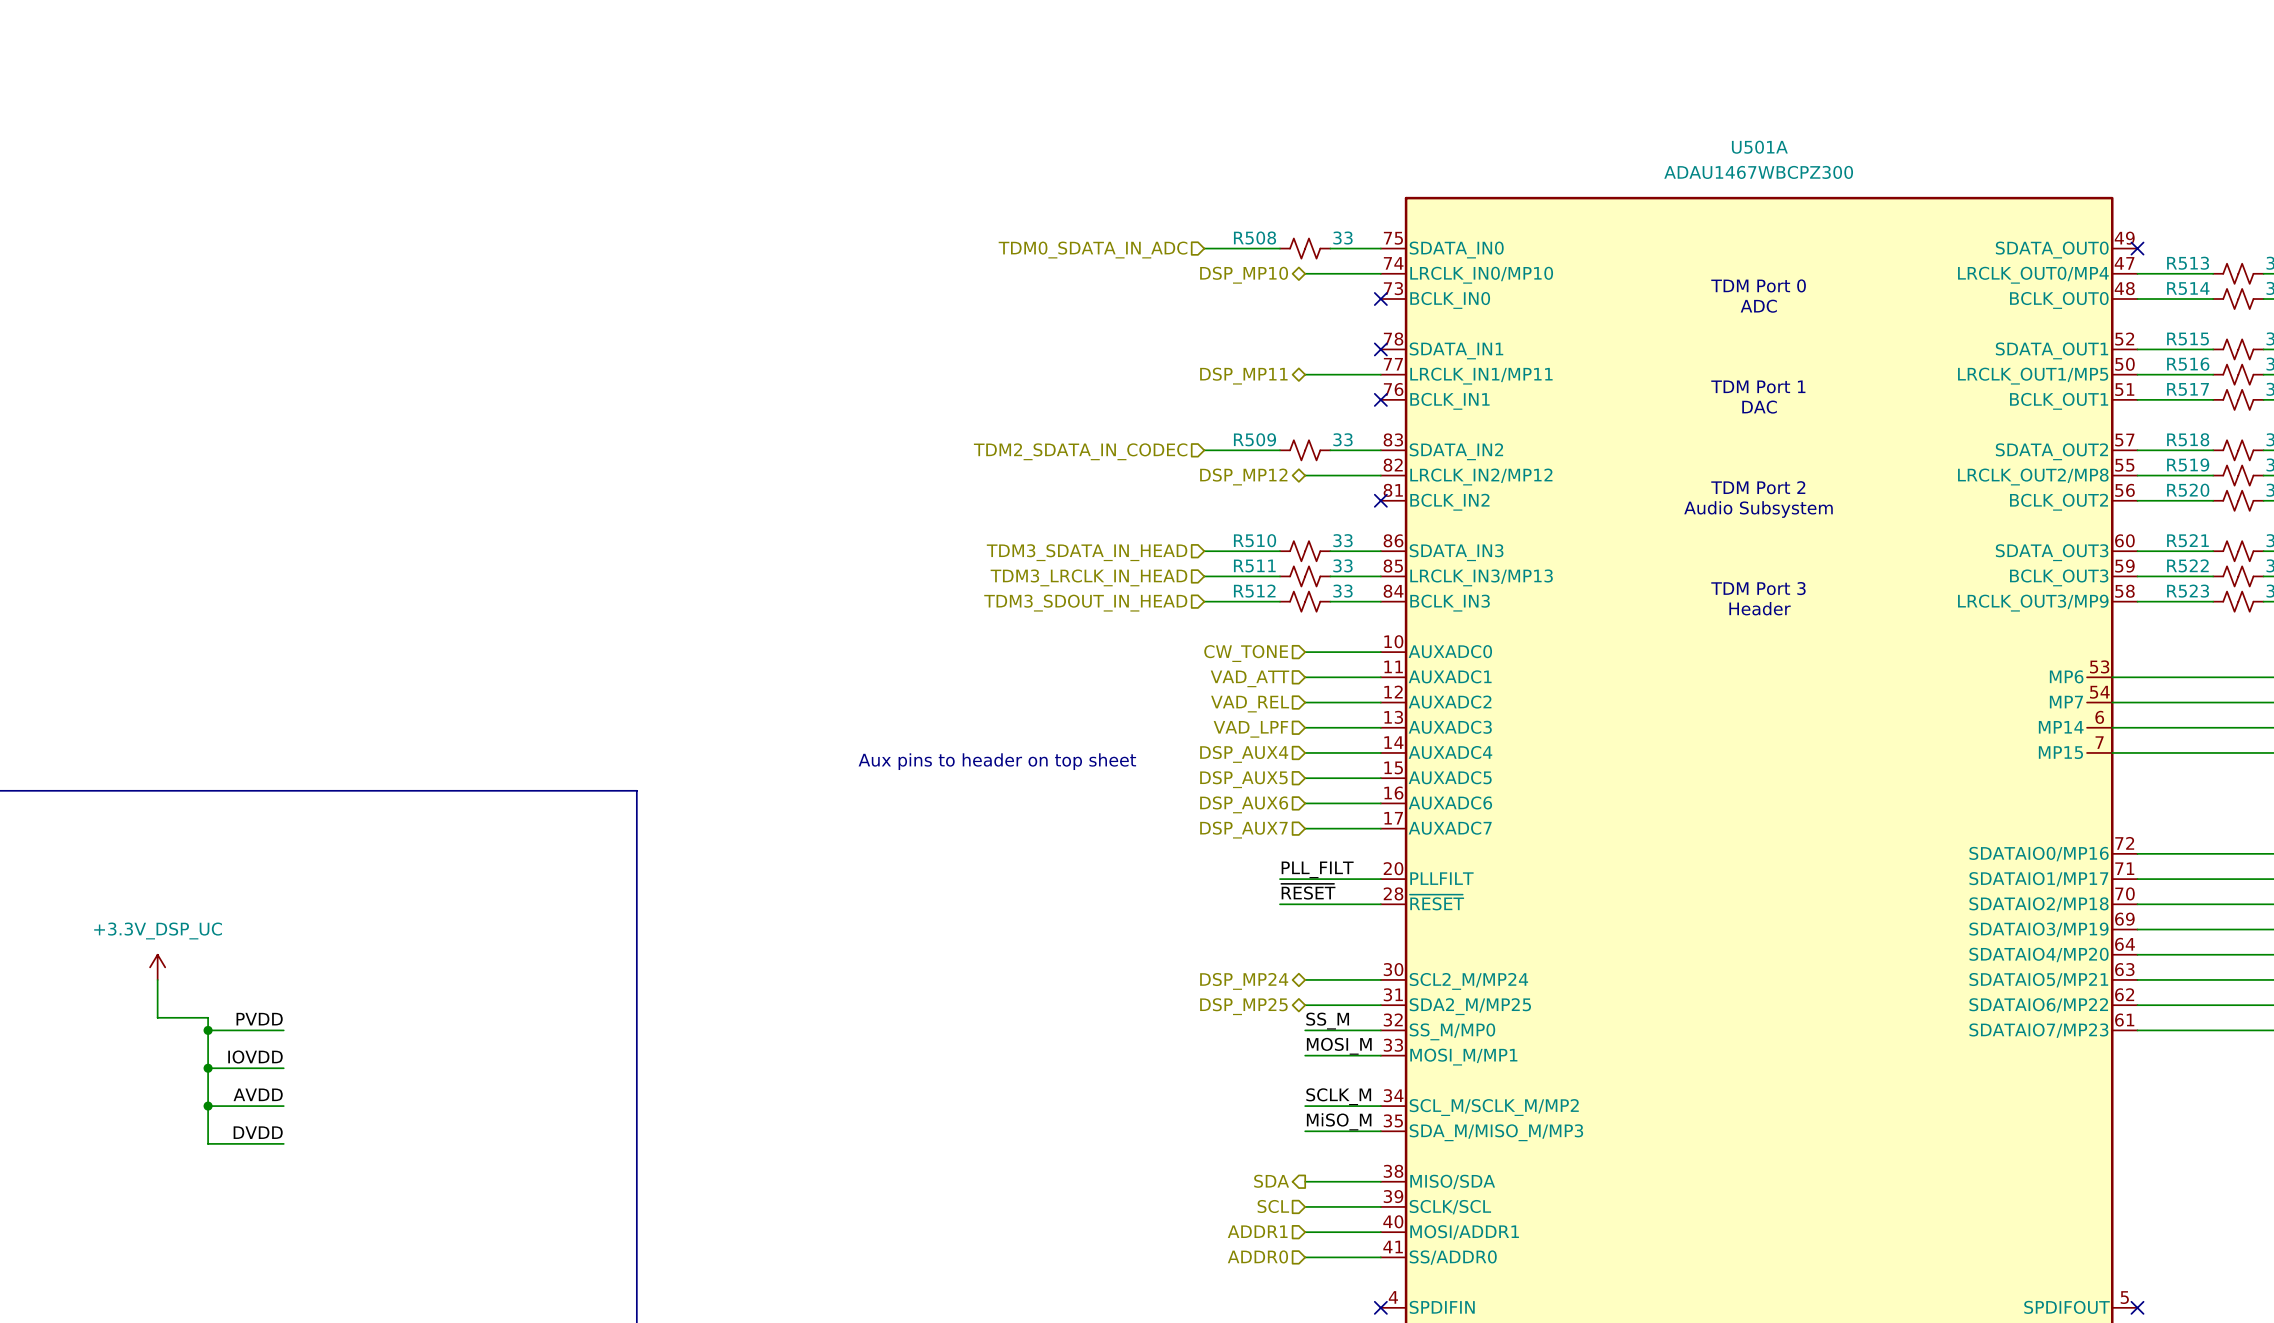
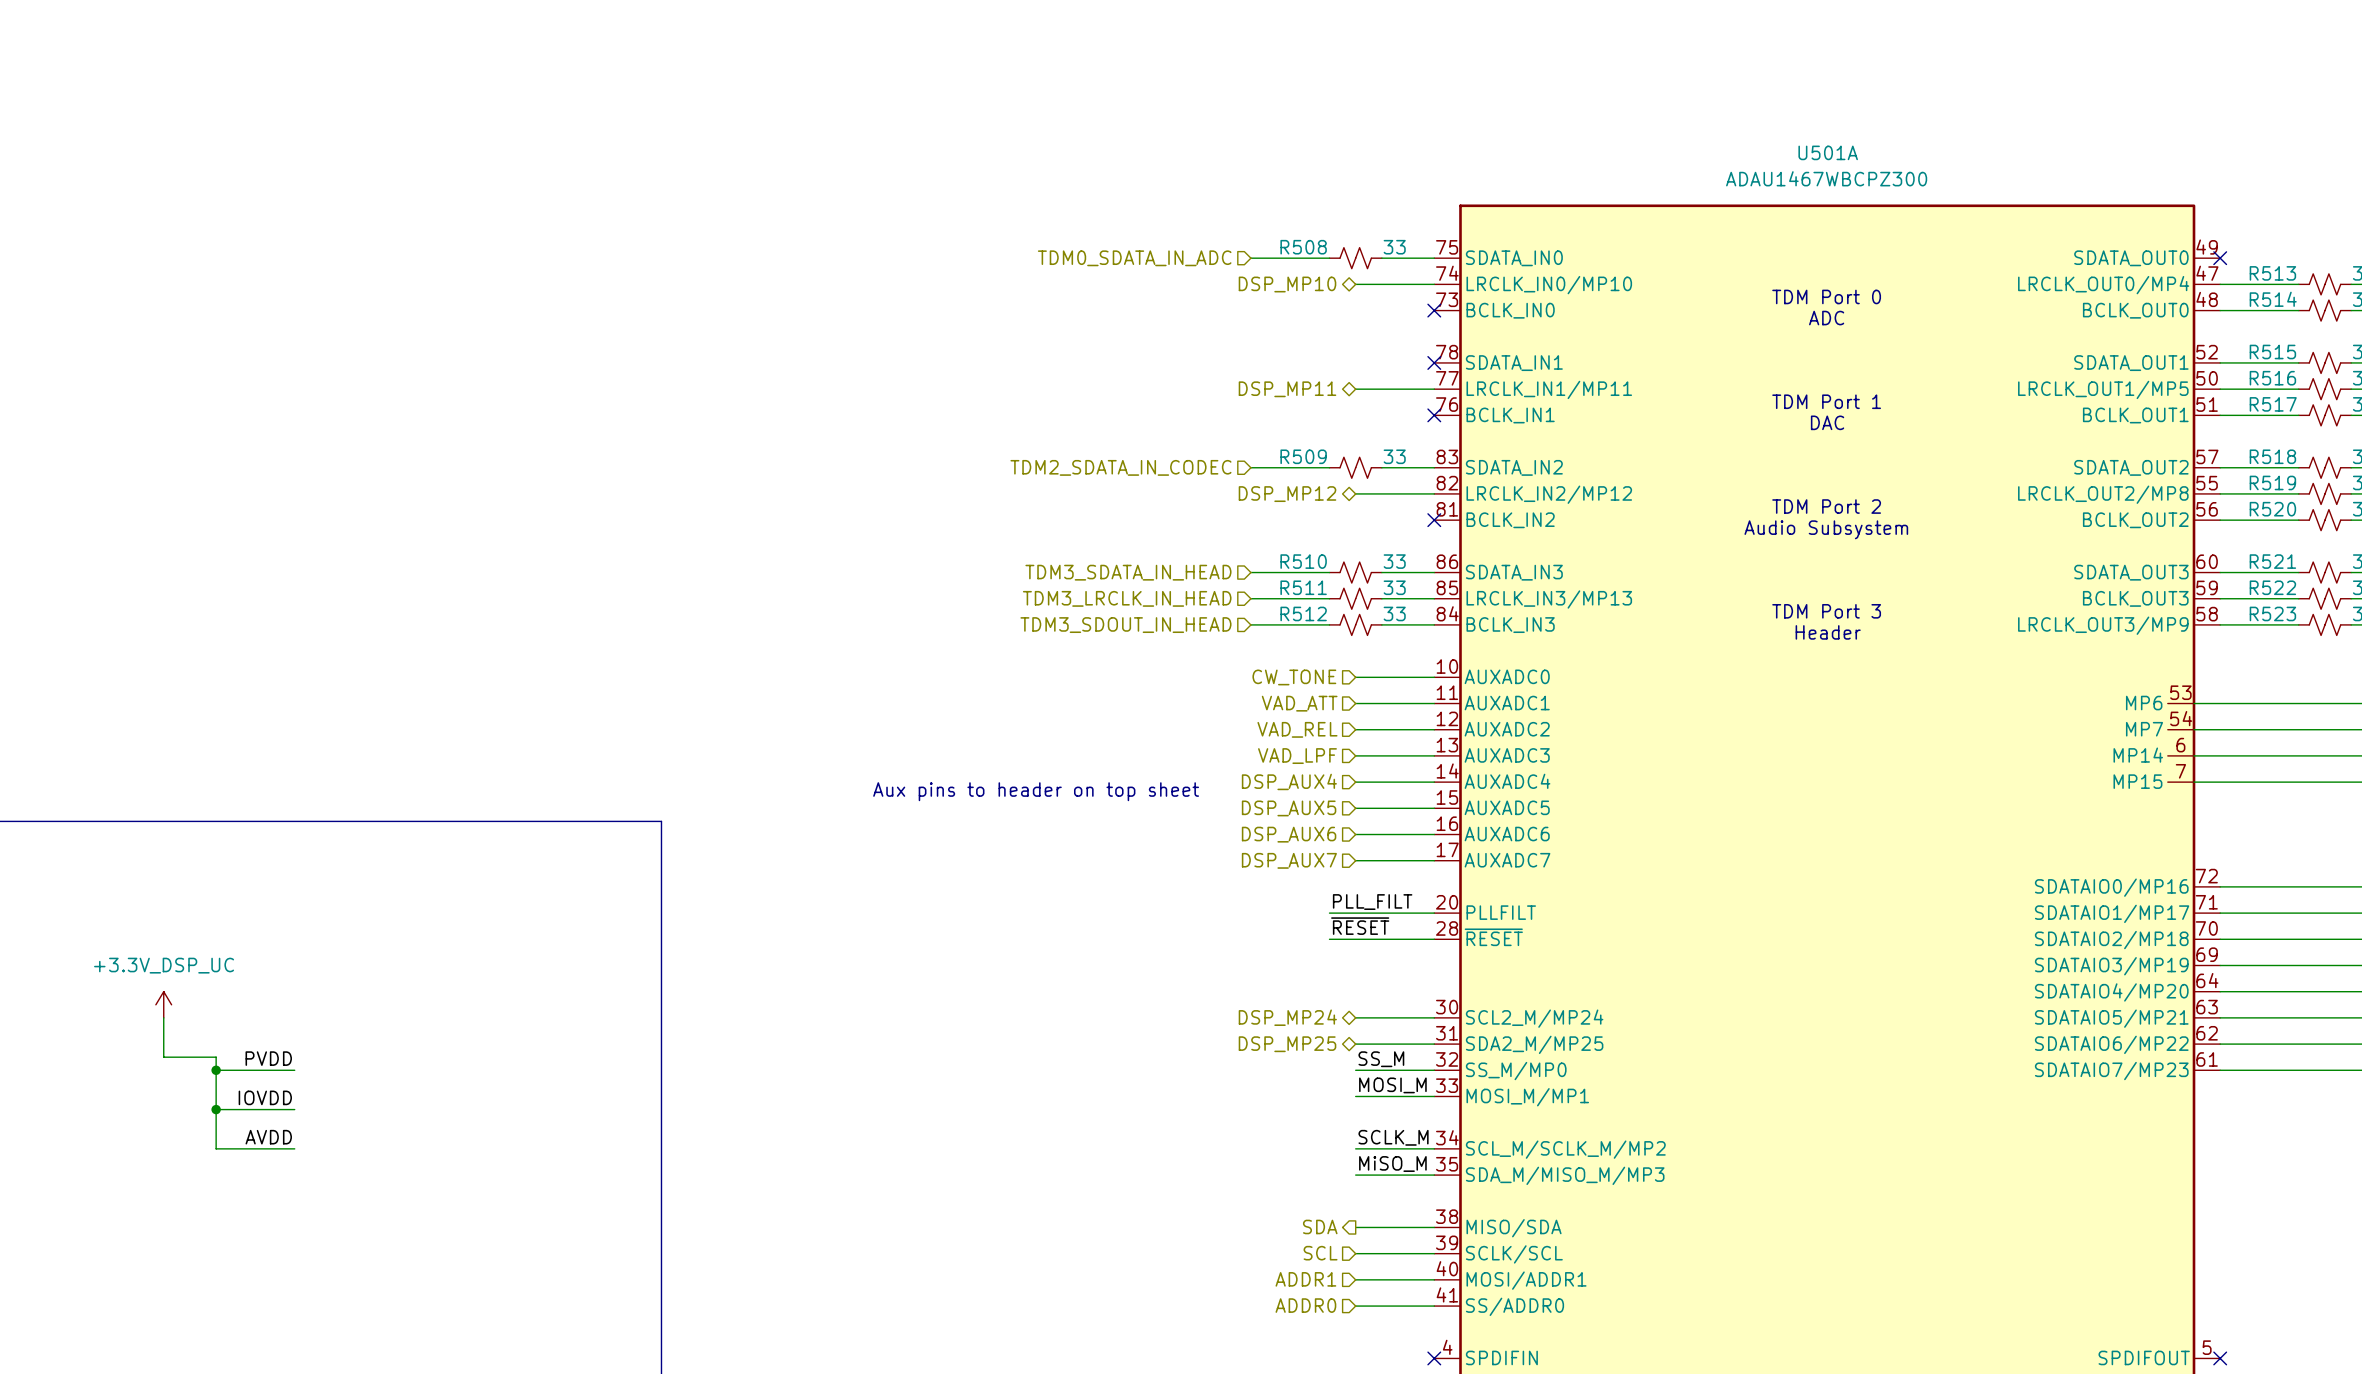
wire: (208, 1106) (208, 1143) (283, 1143) -> none
junction: (208, 1106) -> none
label: DVDD (258, 1132) -> none

